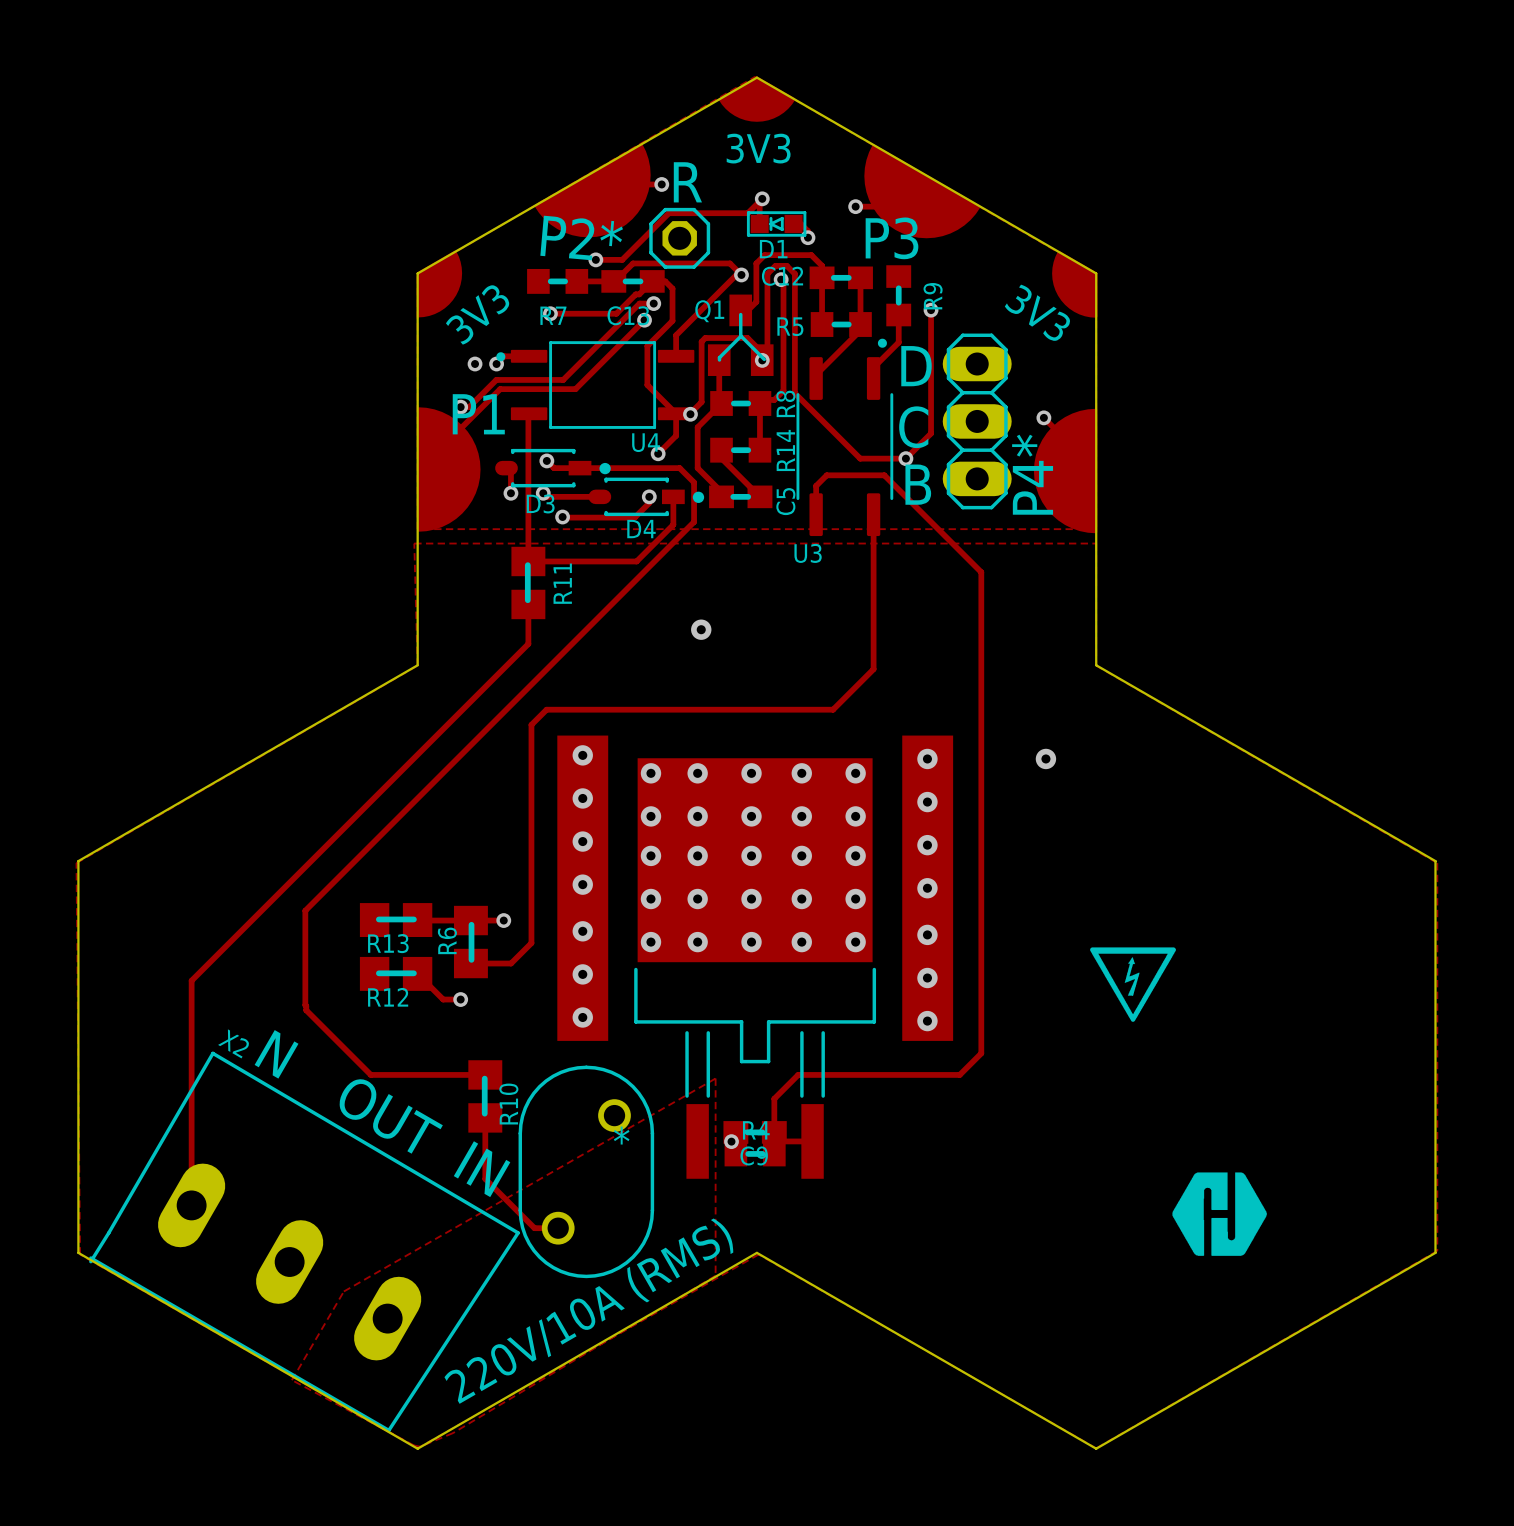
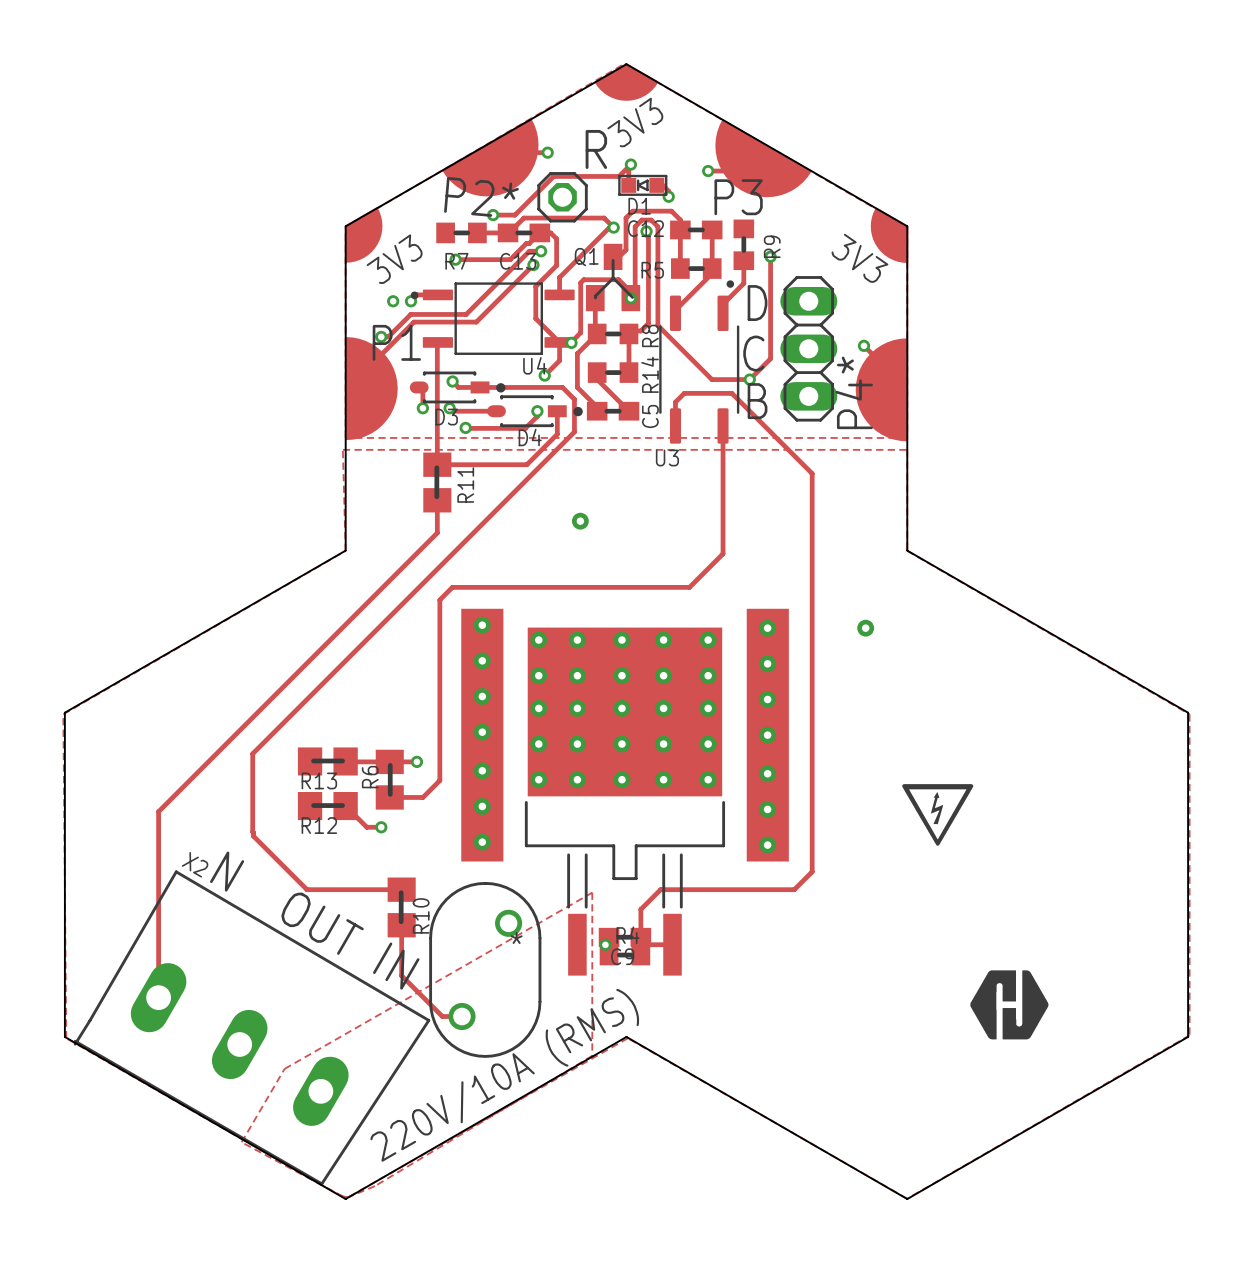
text rotation: 0° (758, 148) -> 35° counterclockwise (635, 122)
text position: R (687, 182) -> R (596, 149)
text rotation: 0° (477, 314) -> 5° clockwise (394, 259)

